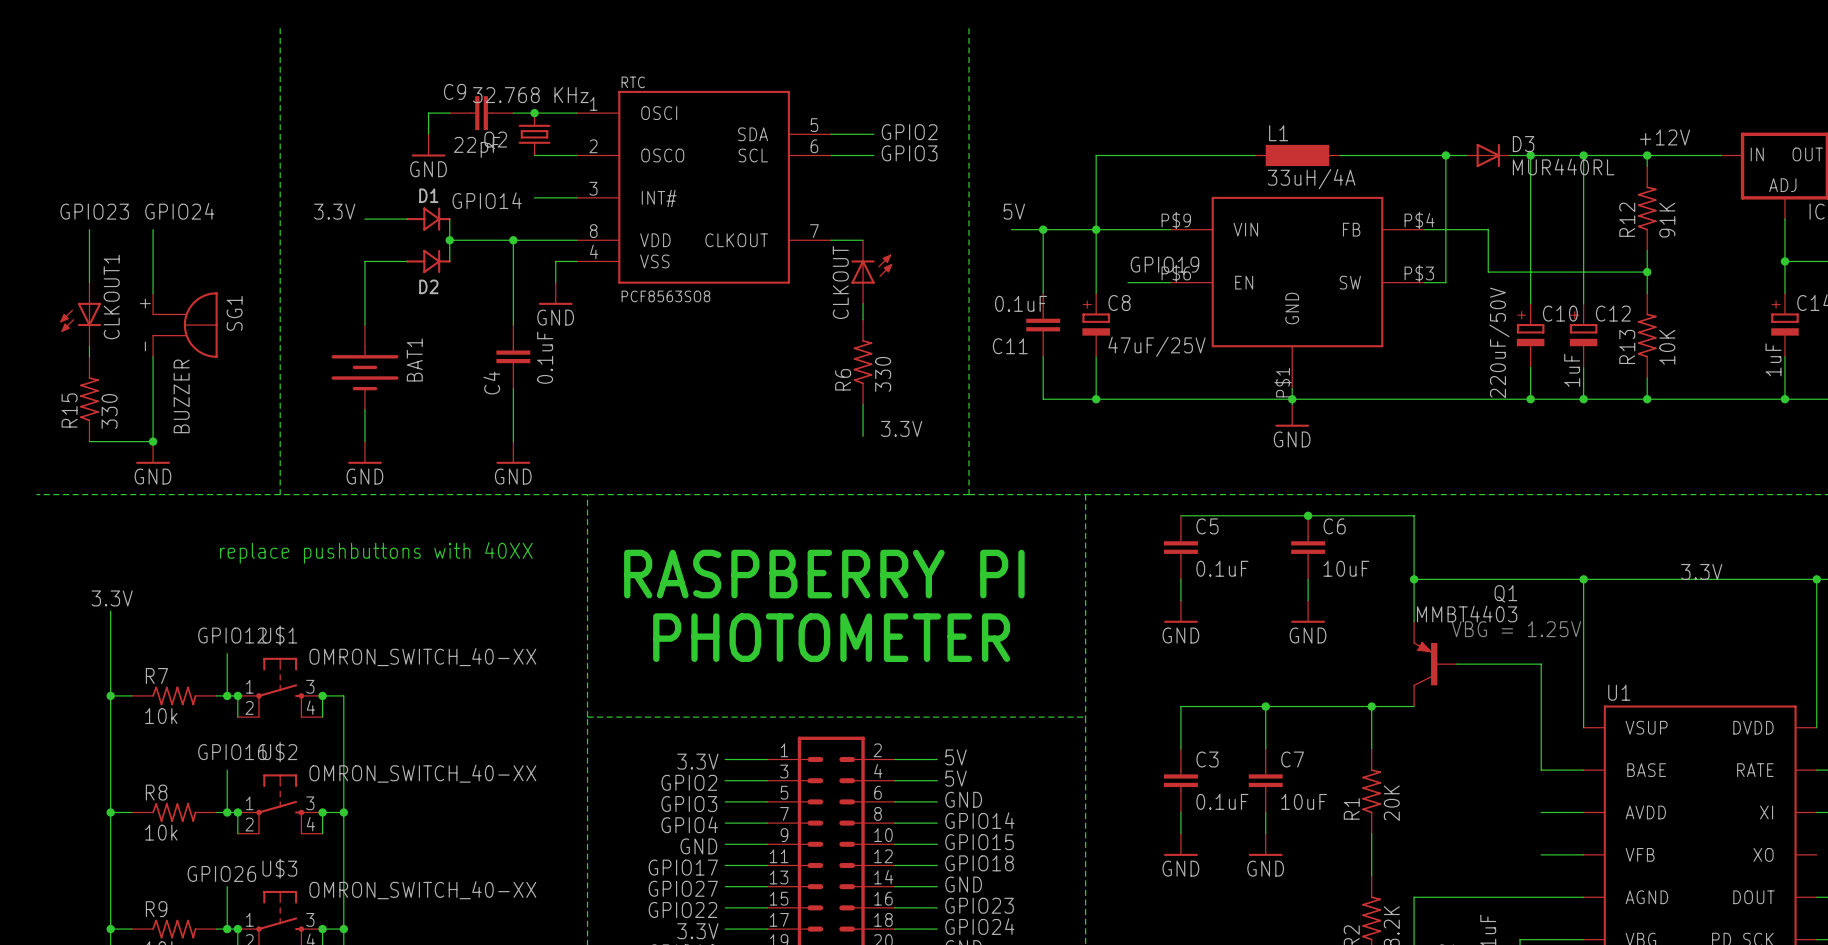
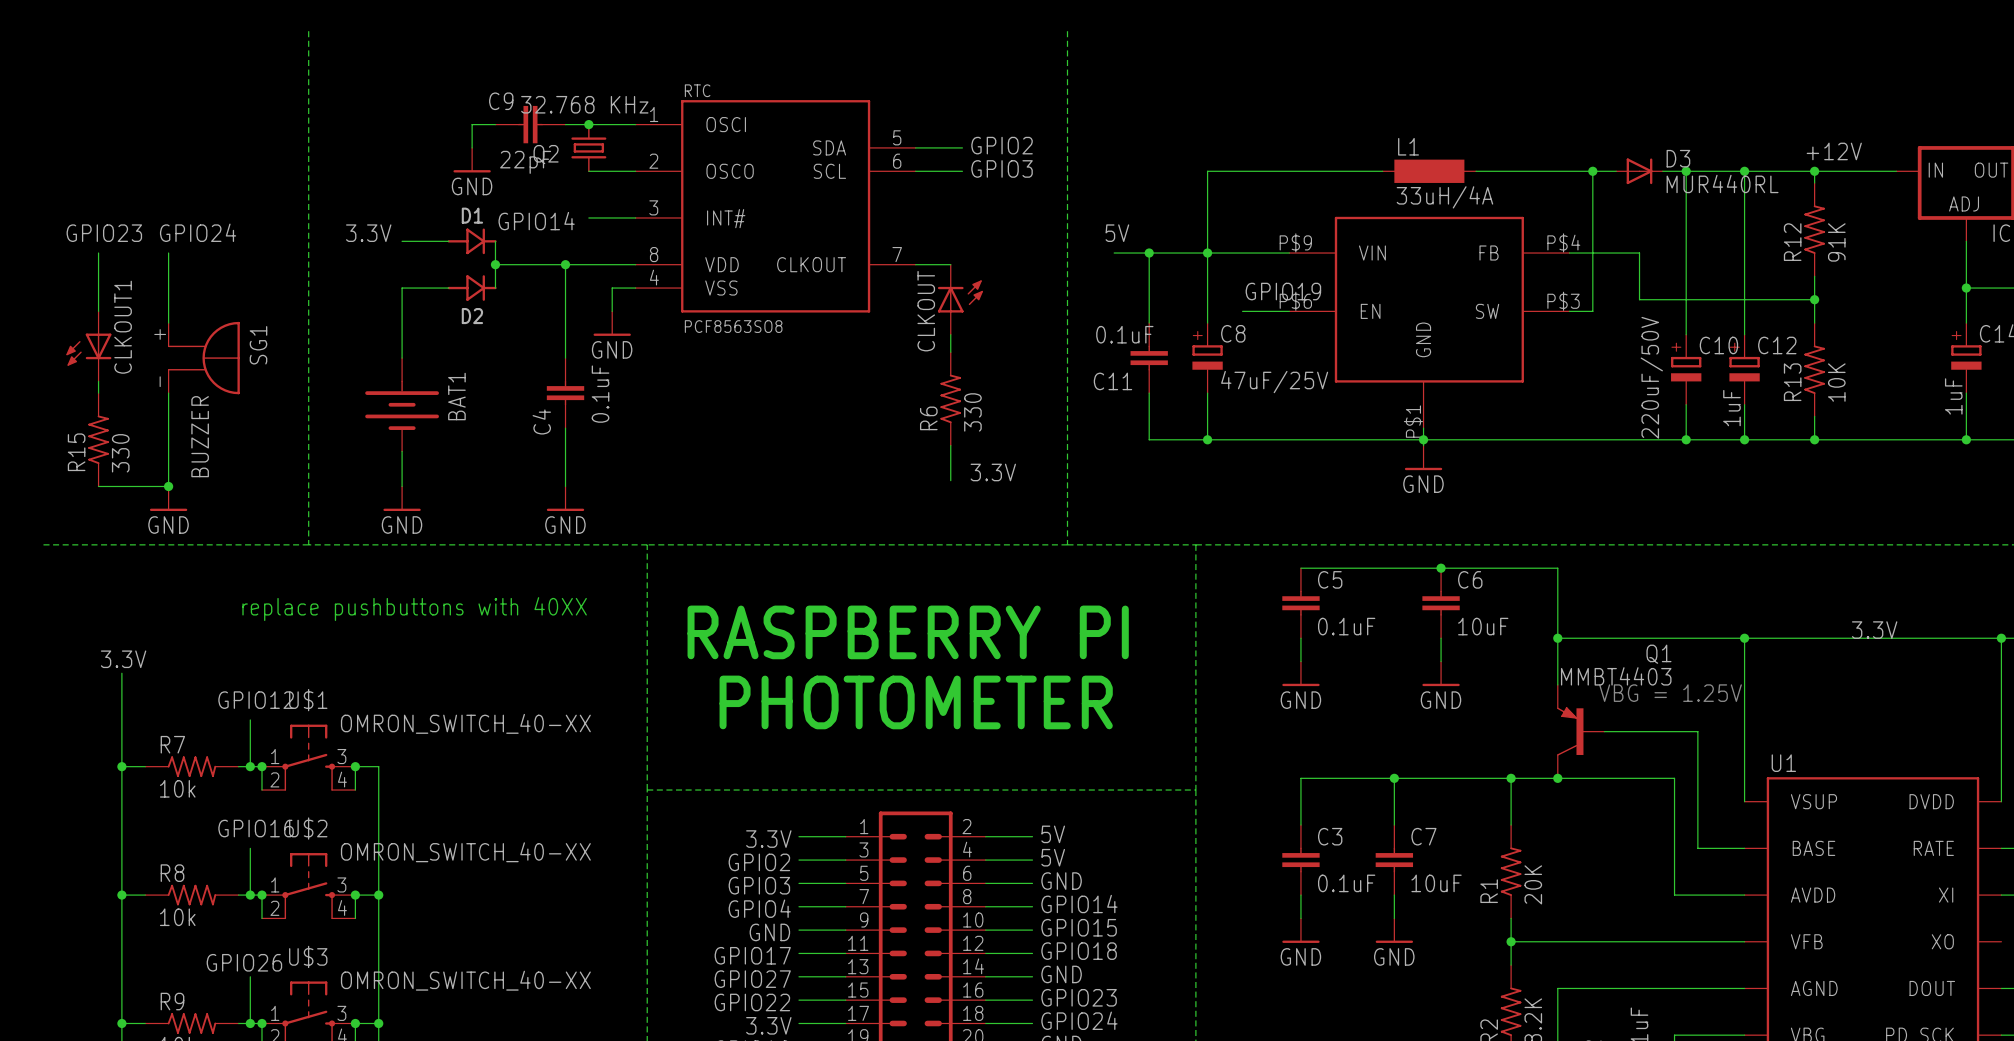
wire: none -> (1557, 778) (1674, 778) (1674, 895) (1697, 895)
junction: none -> (1557, 778)
wire: none -> (1511, 941) (1697, 941)
junction: none -> (1511, 941)

